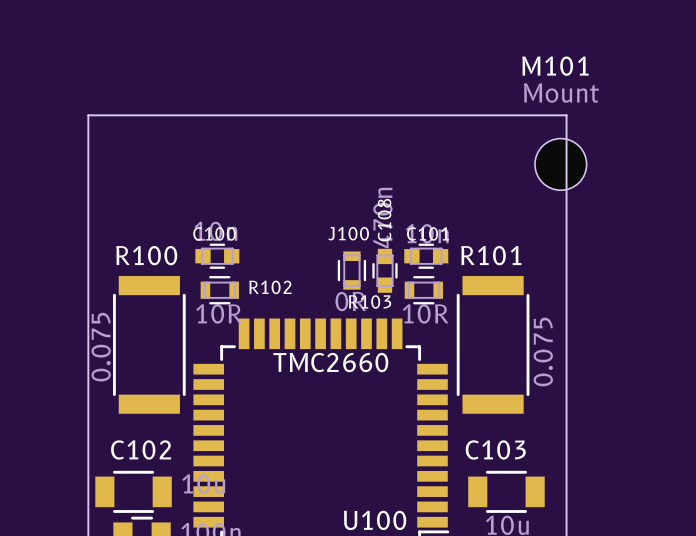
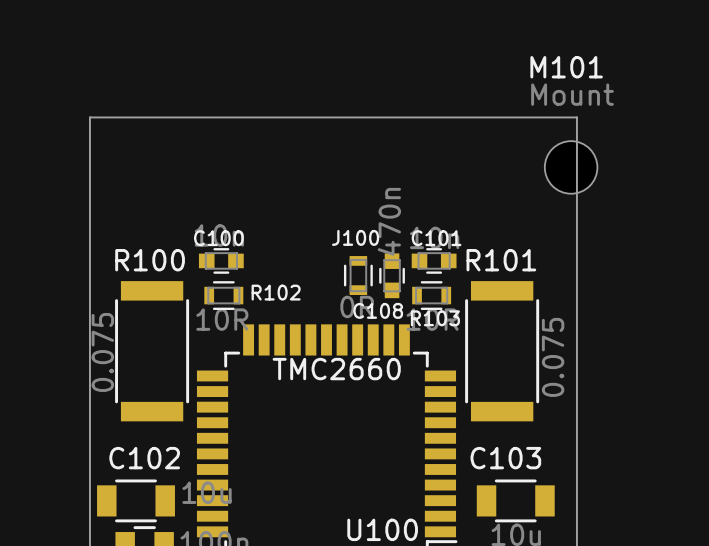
C108 name rotation: 0° (384, 220) -> 90° clockwise (378, 310)
C108 name position: C108 (384, 220) -> C108 (378, 310)
R103 name position: R103 (370, 301) -> R103 (435, 318)

